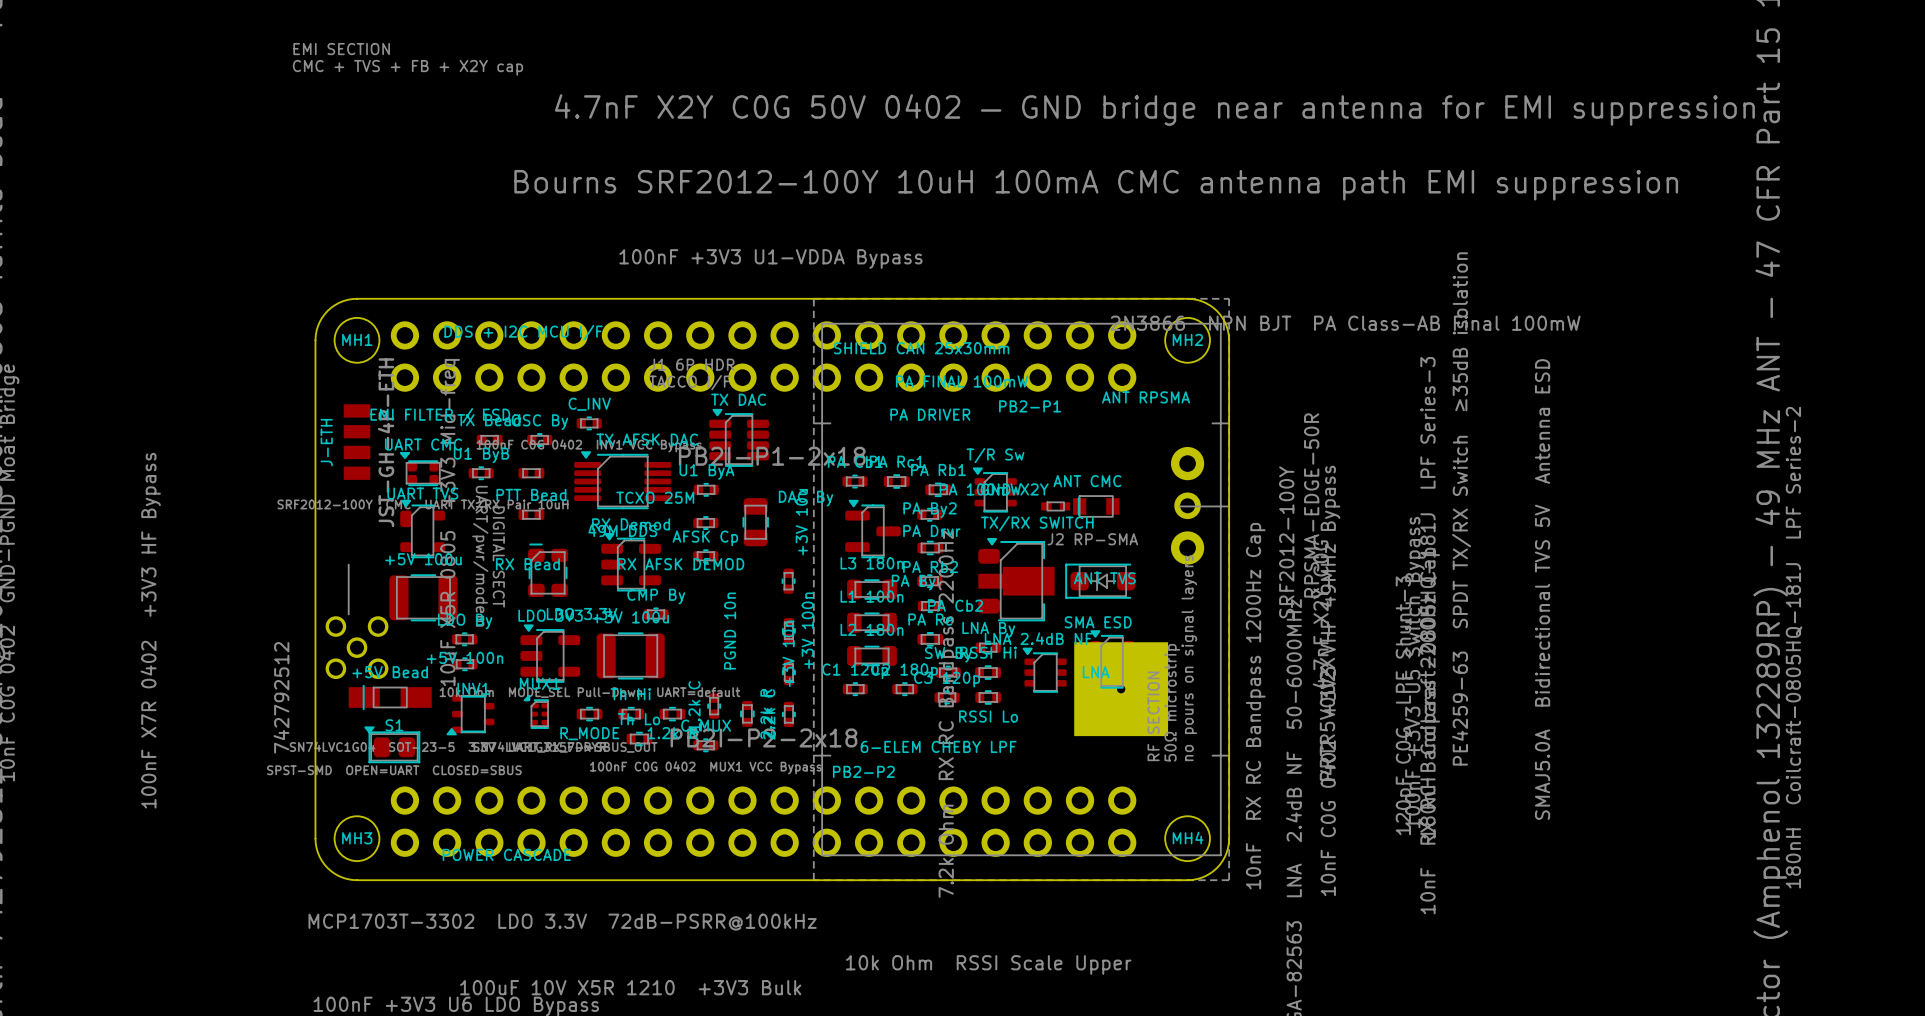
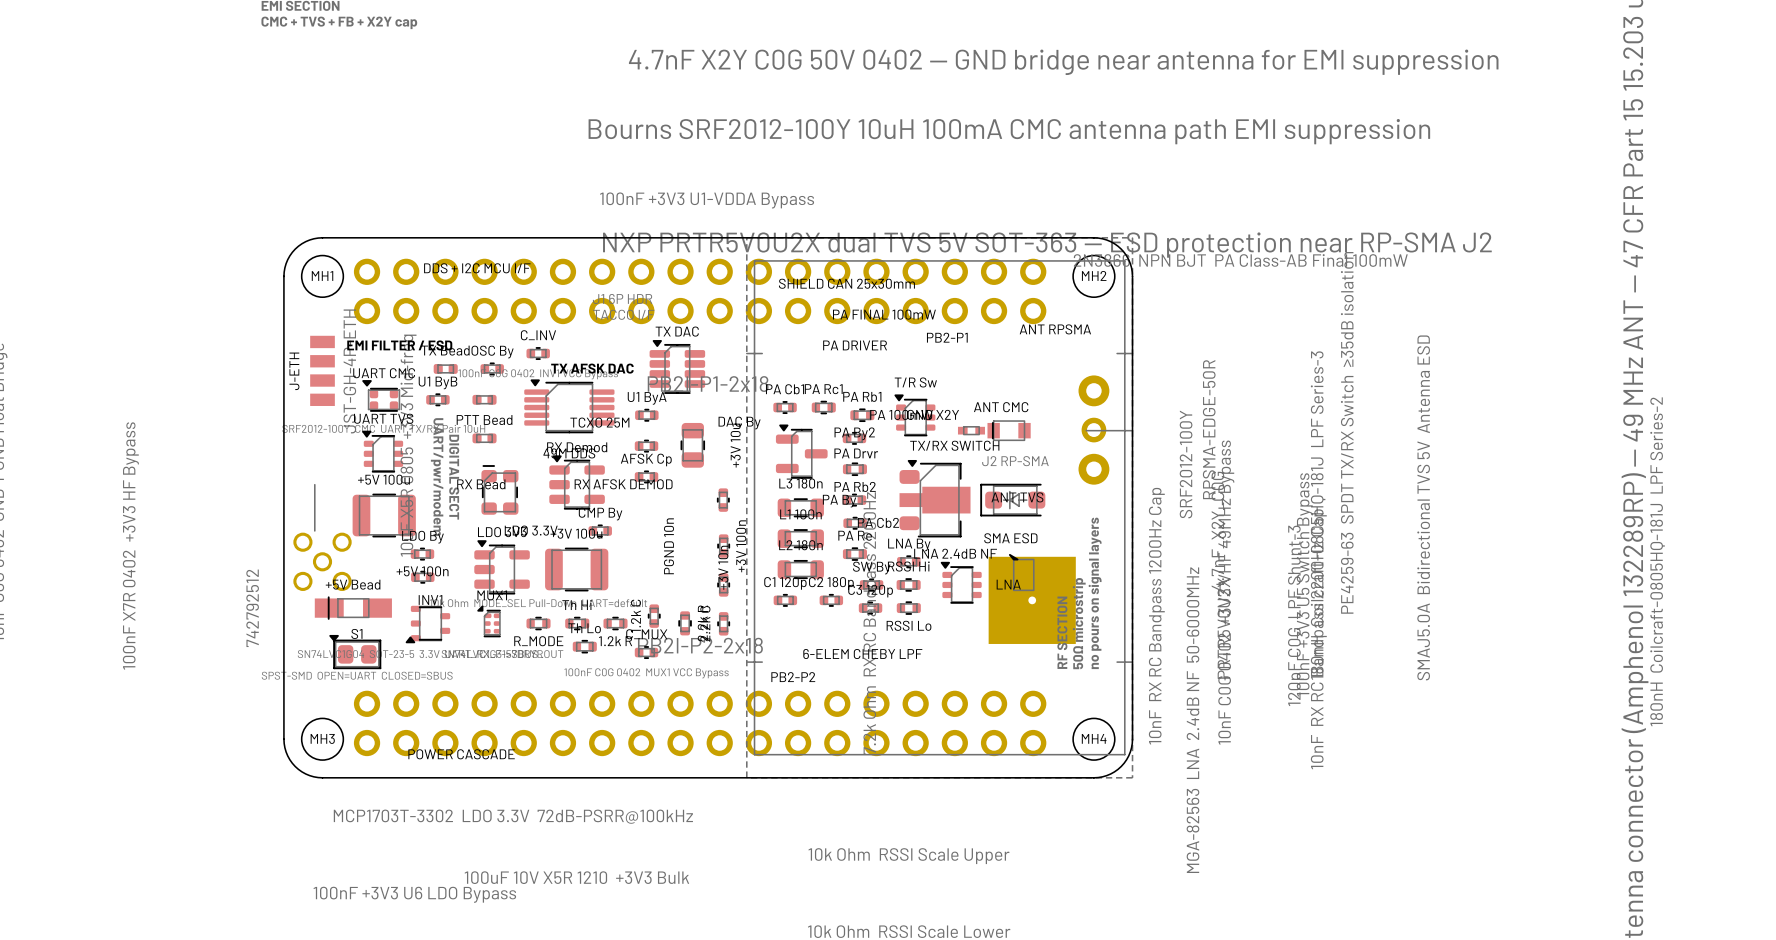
ANT TVS text: none -> NXP PRTR5V0U2X dual TVS 5V SOT-363 — ESD protection near RP-SMA J2 (1047, 245)
UART TVS footprint: [400, 499, 446, 559] -> [362, 430, 404, 473]
ANT TVS footprint: [1089, 630, 1135, 689] -> [1004, 553, 1044, 592]

